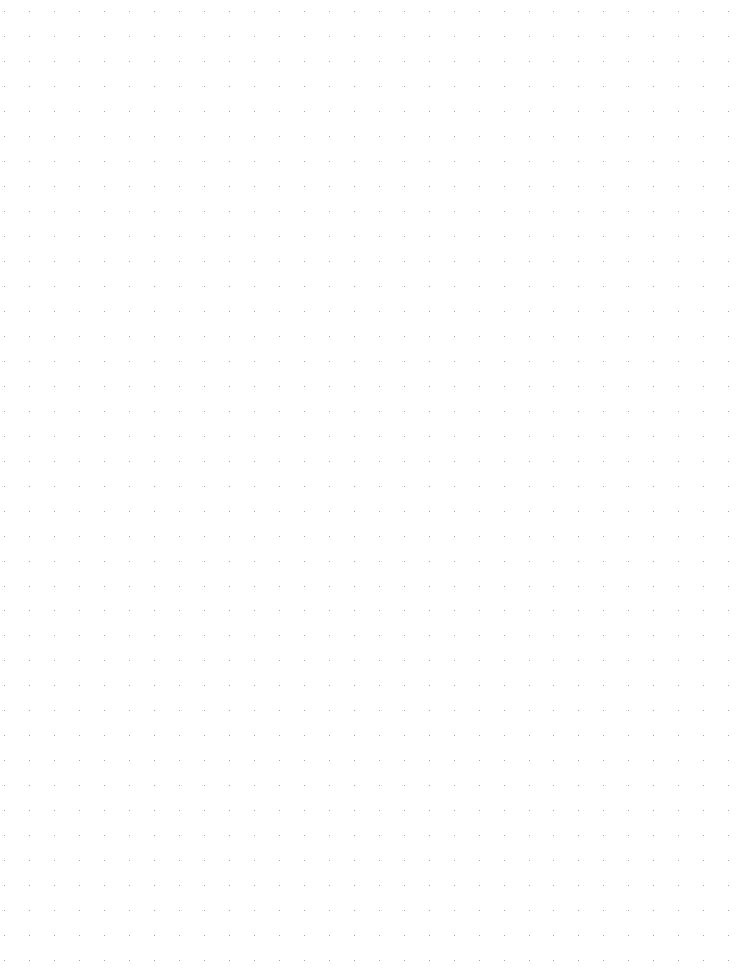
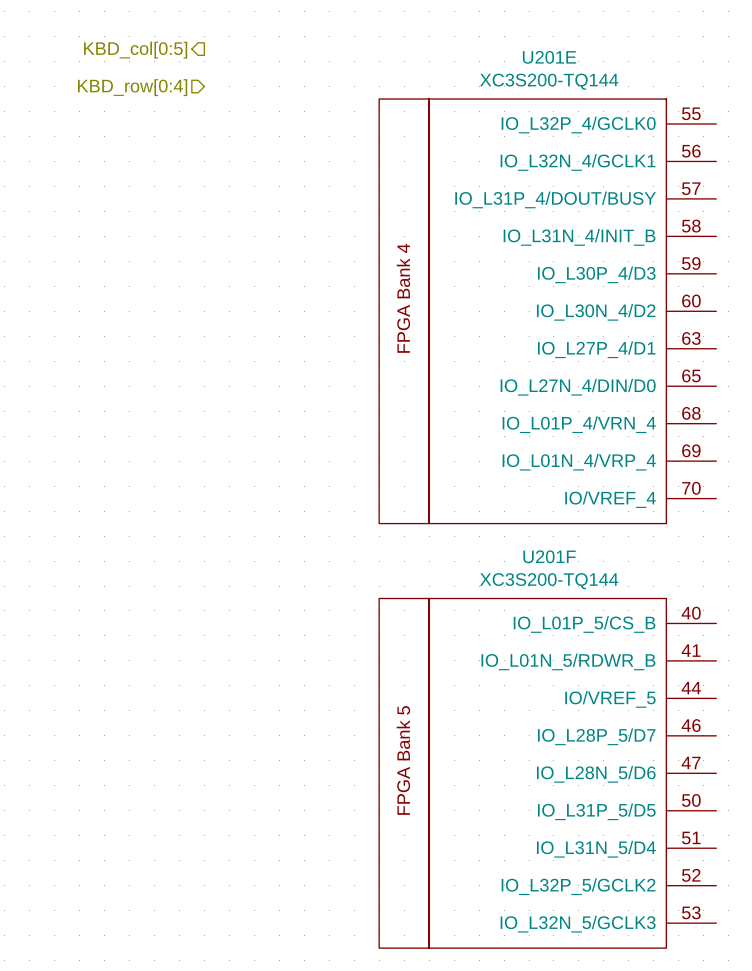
hierarchical label: none -> KBD_col[0:5] (135, 50)
hierarchical label: none -> KBD_row[0:4] (132, 87)
U201E: none -> XC3S200-TQ144 (547, 311)
U201F: none -> XC3S200-TQ144 (547, 773)

